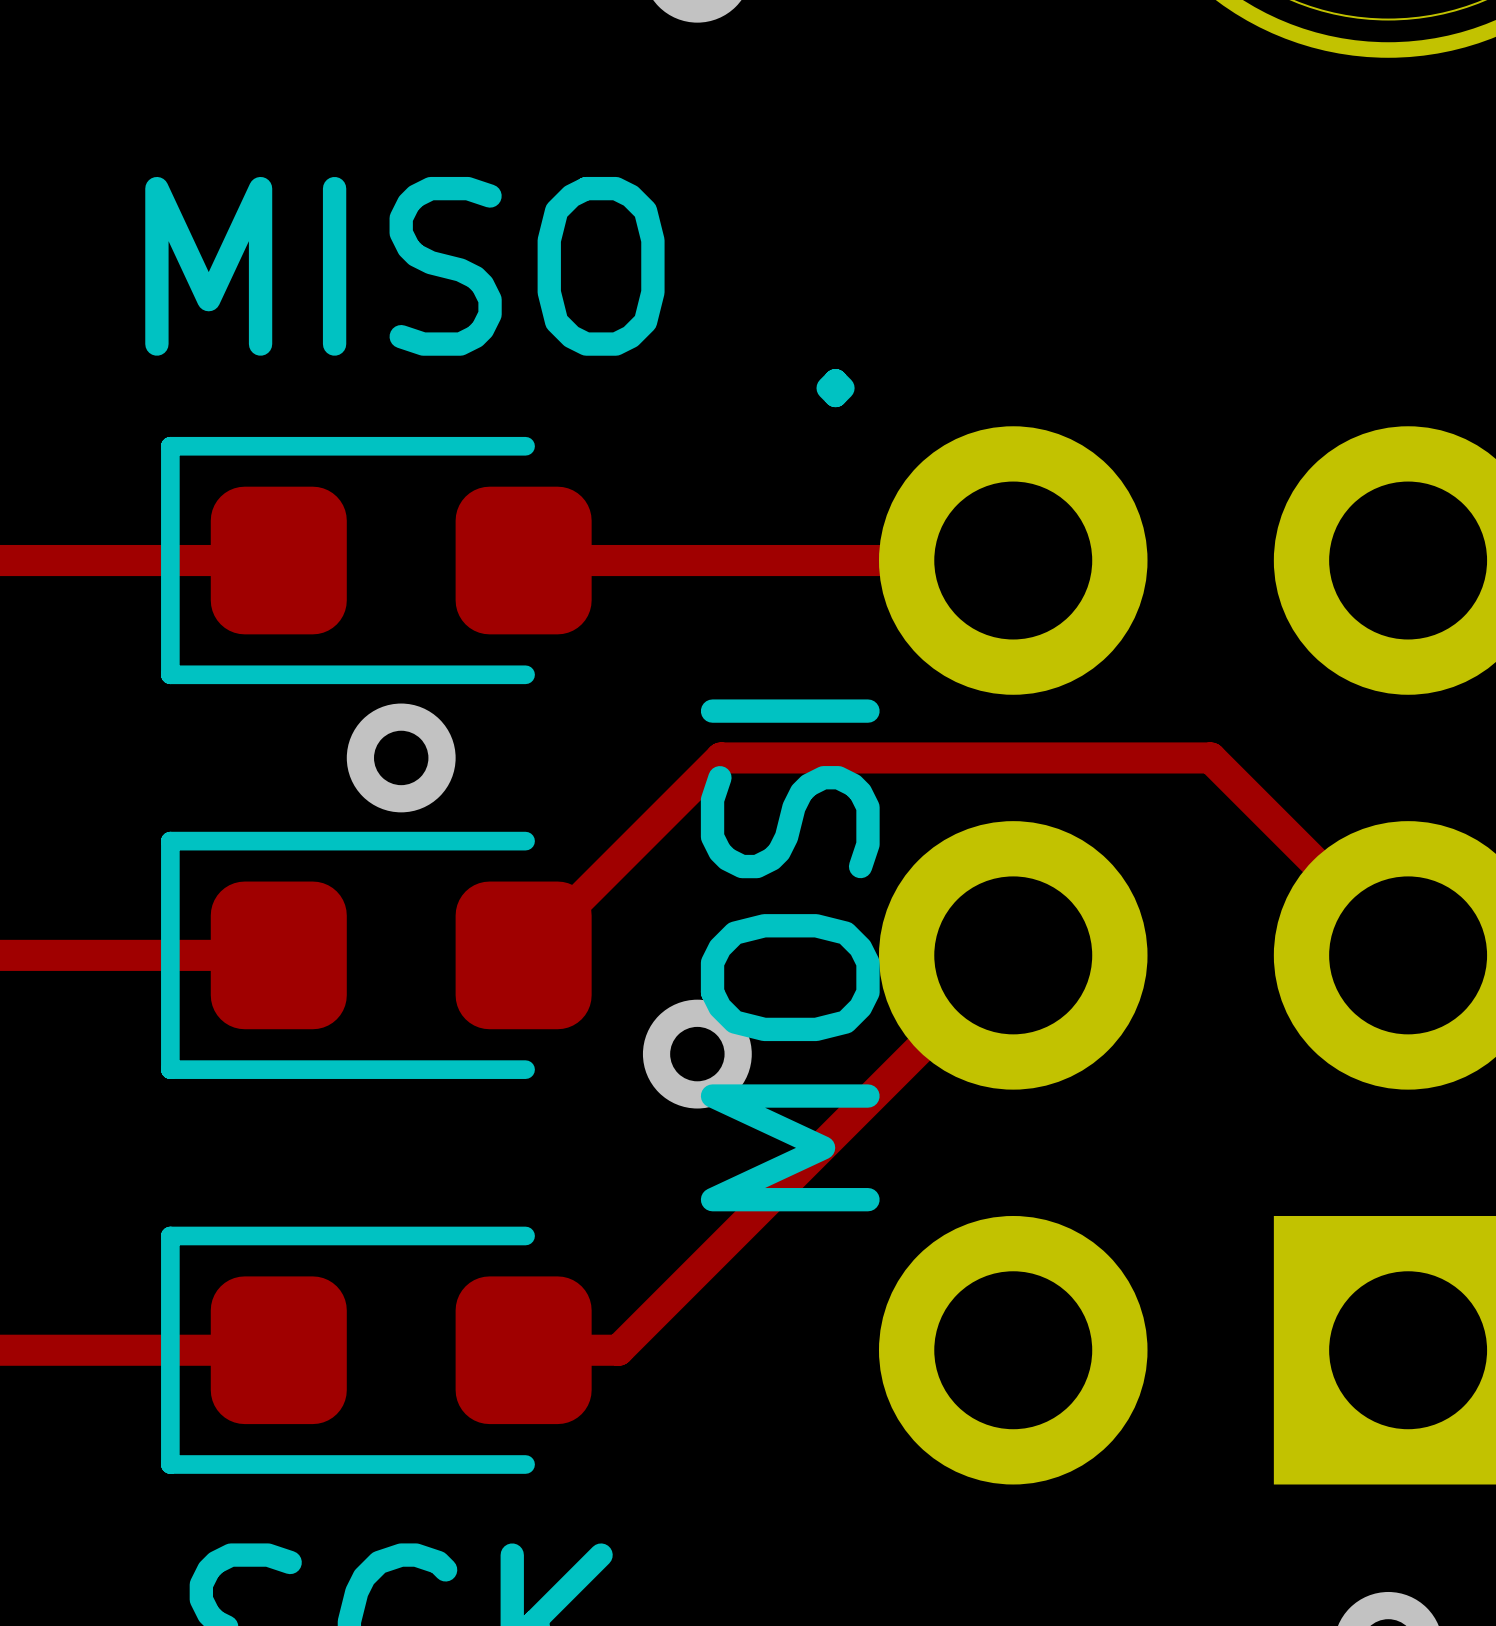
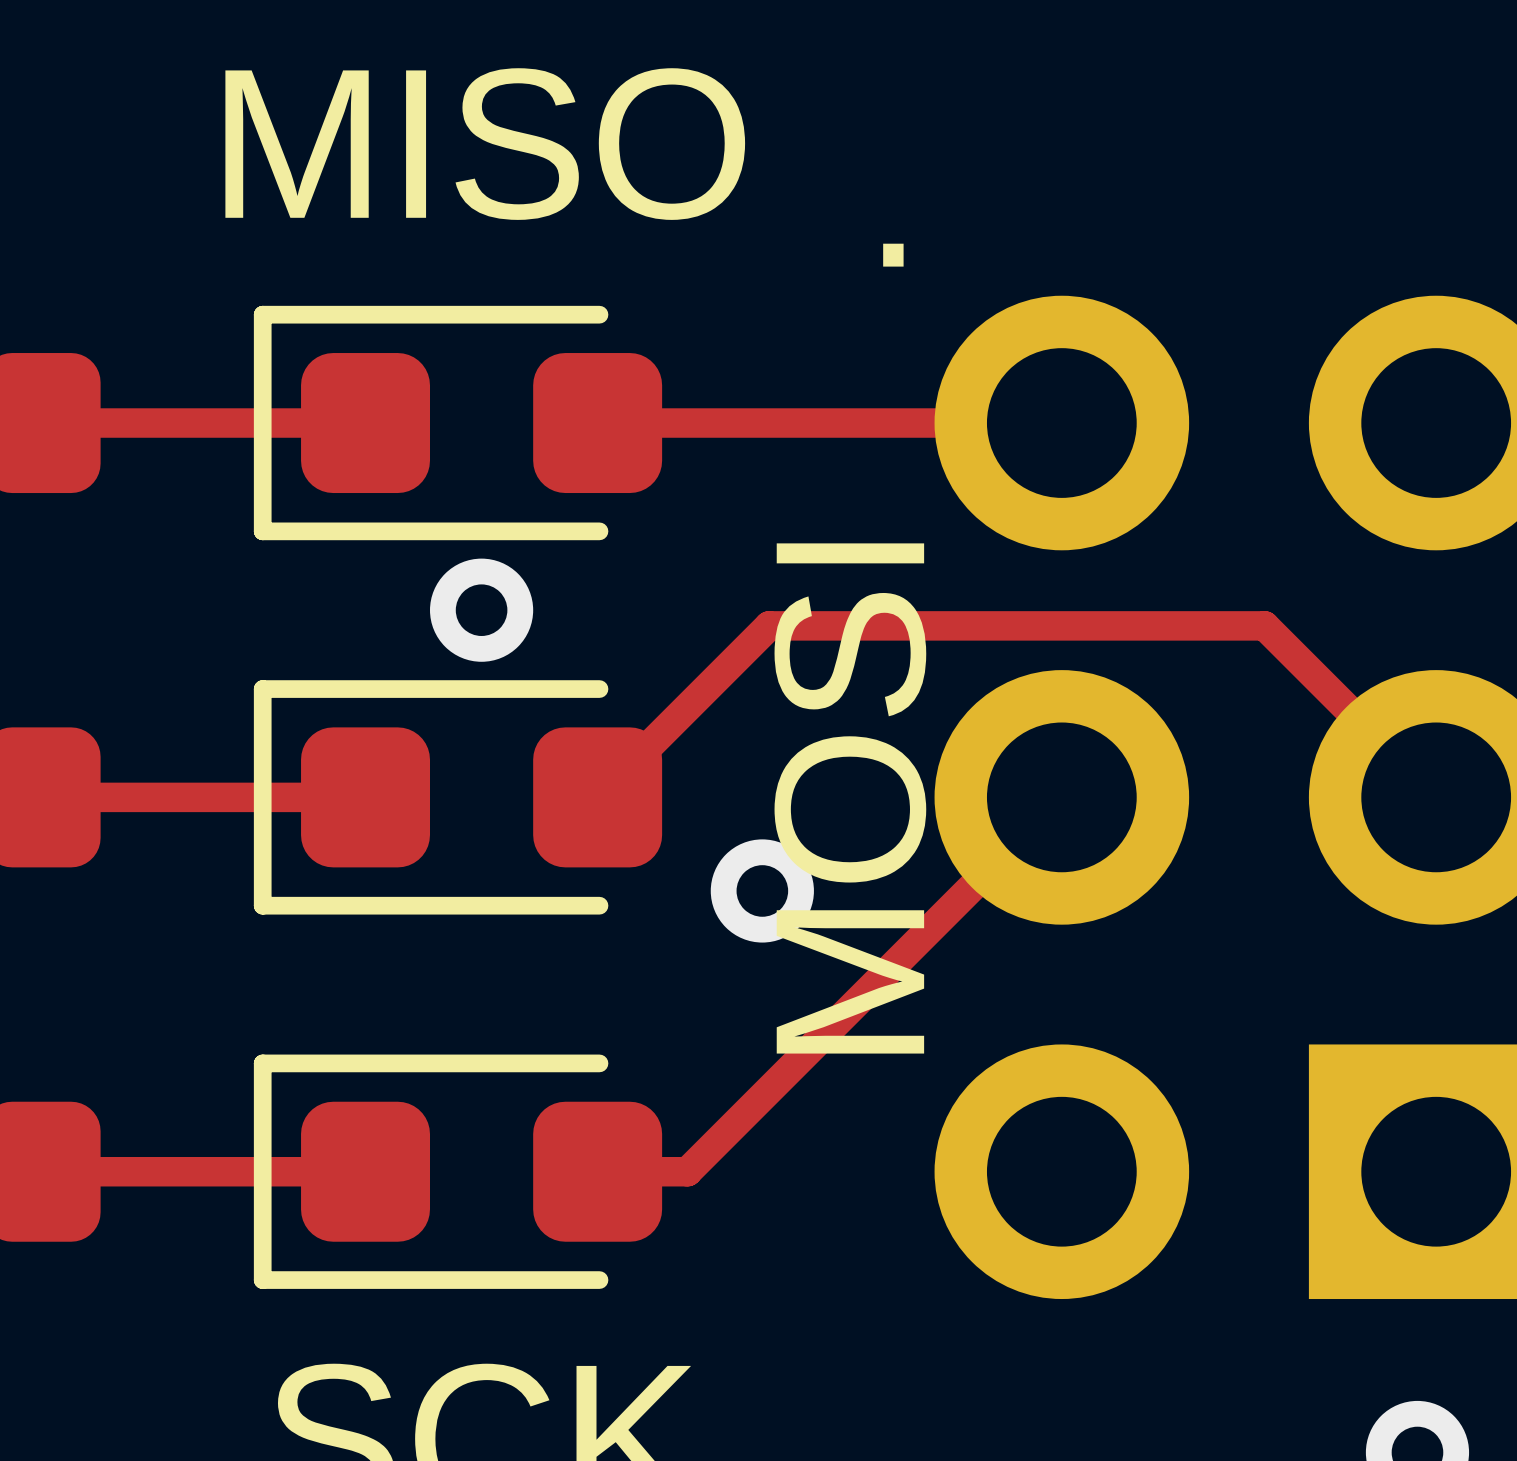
top track: (704, 774) (721, 757) (1210, 757) (1227, 774) -> (769, 625) (1264, 625)

